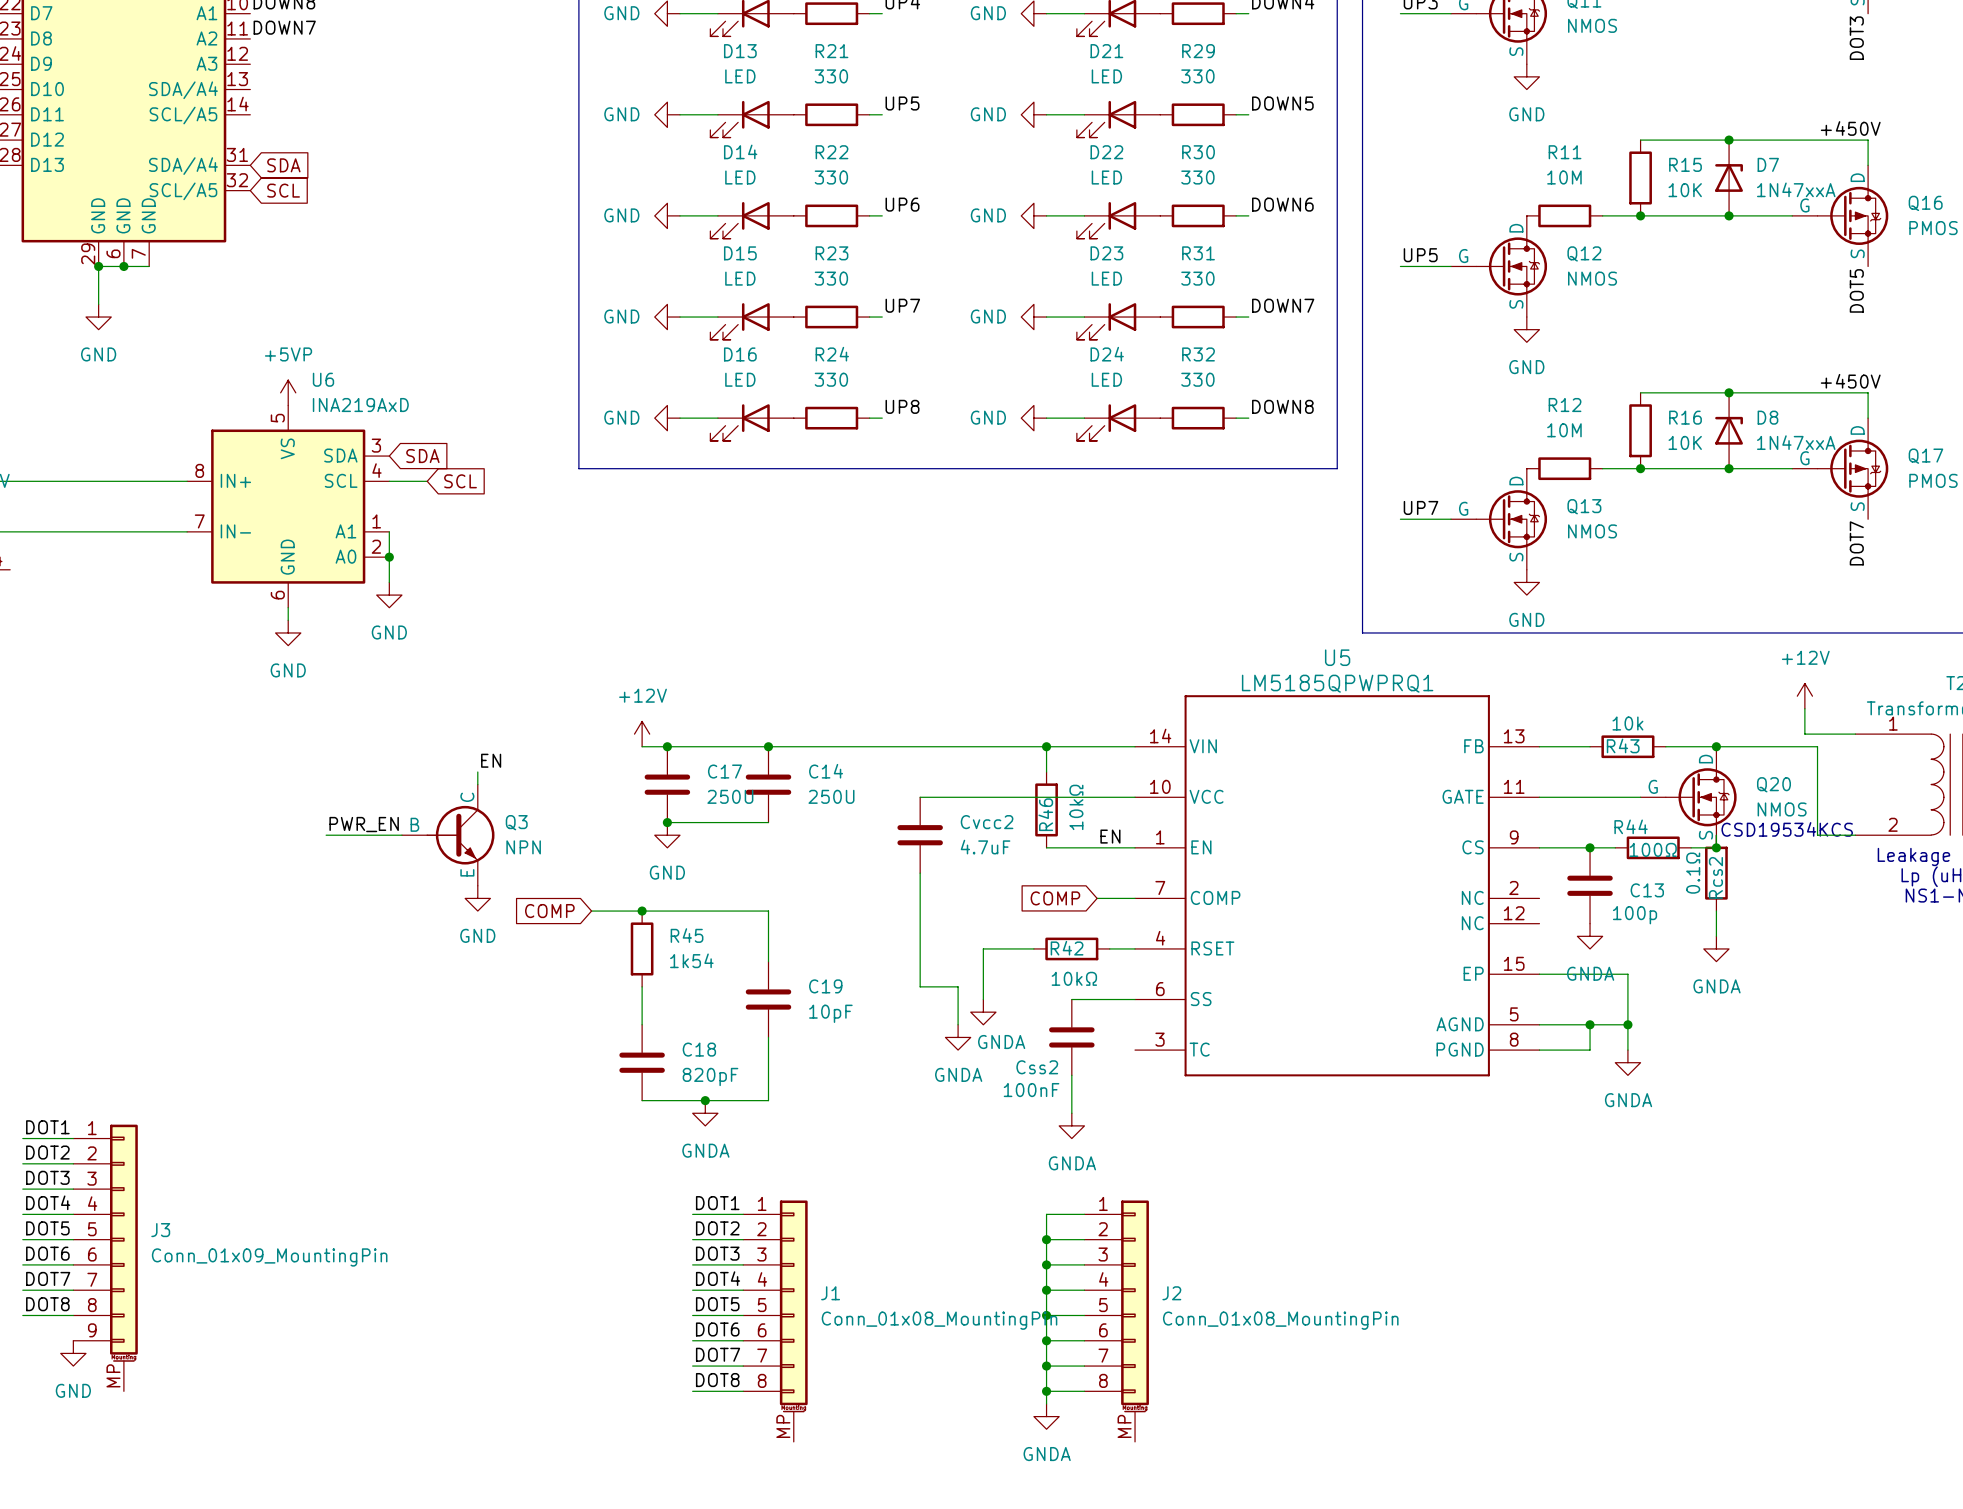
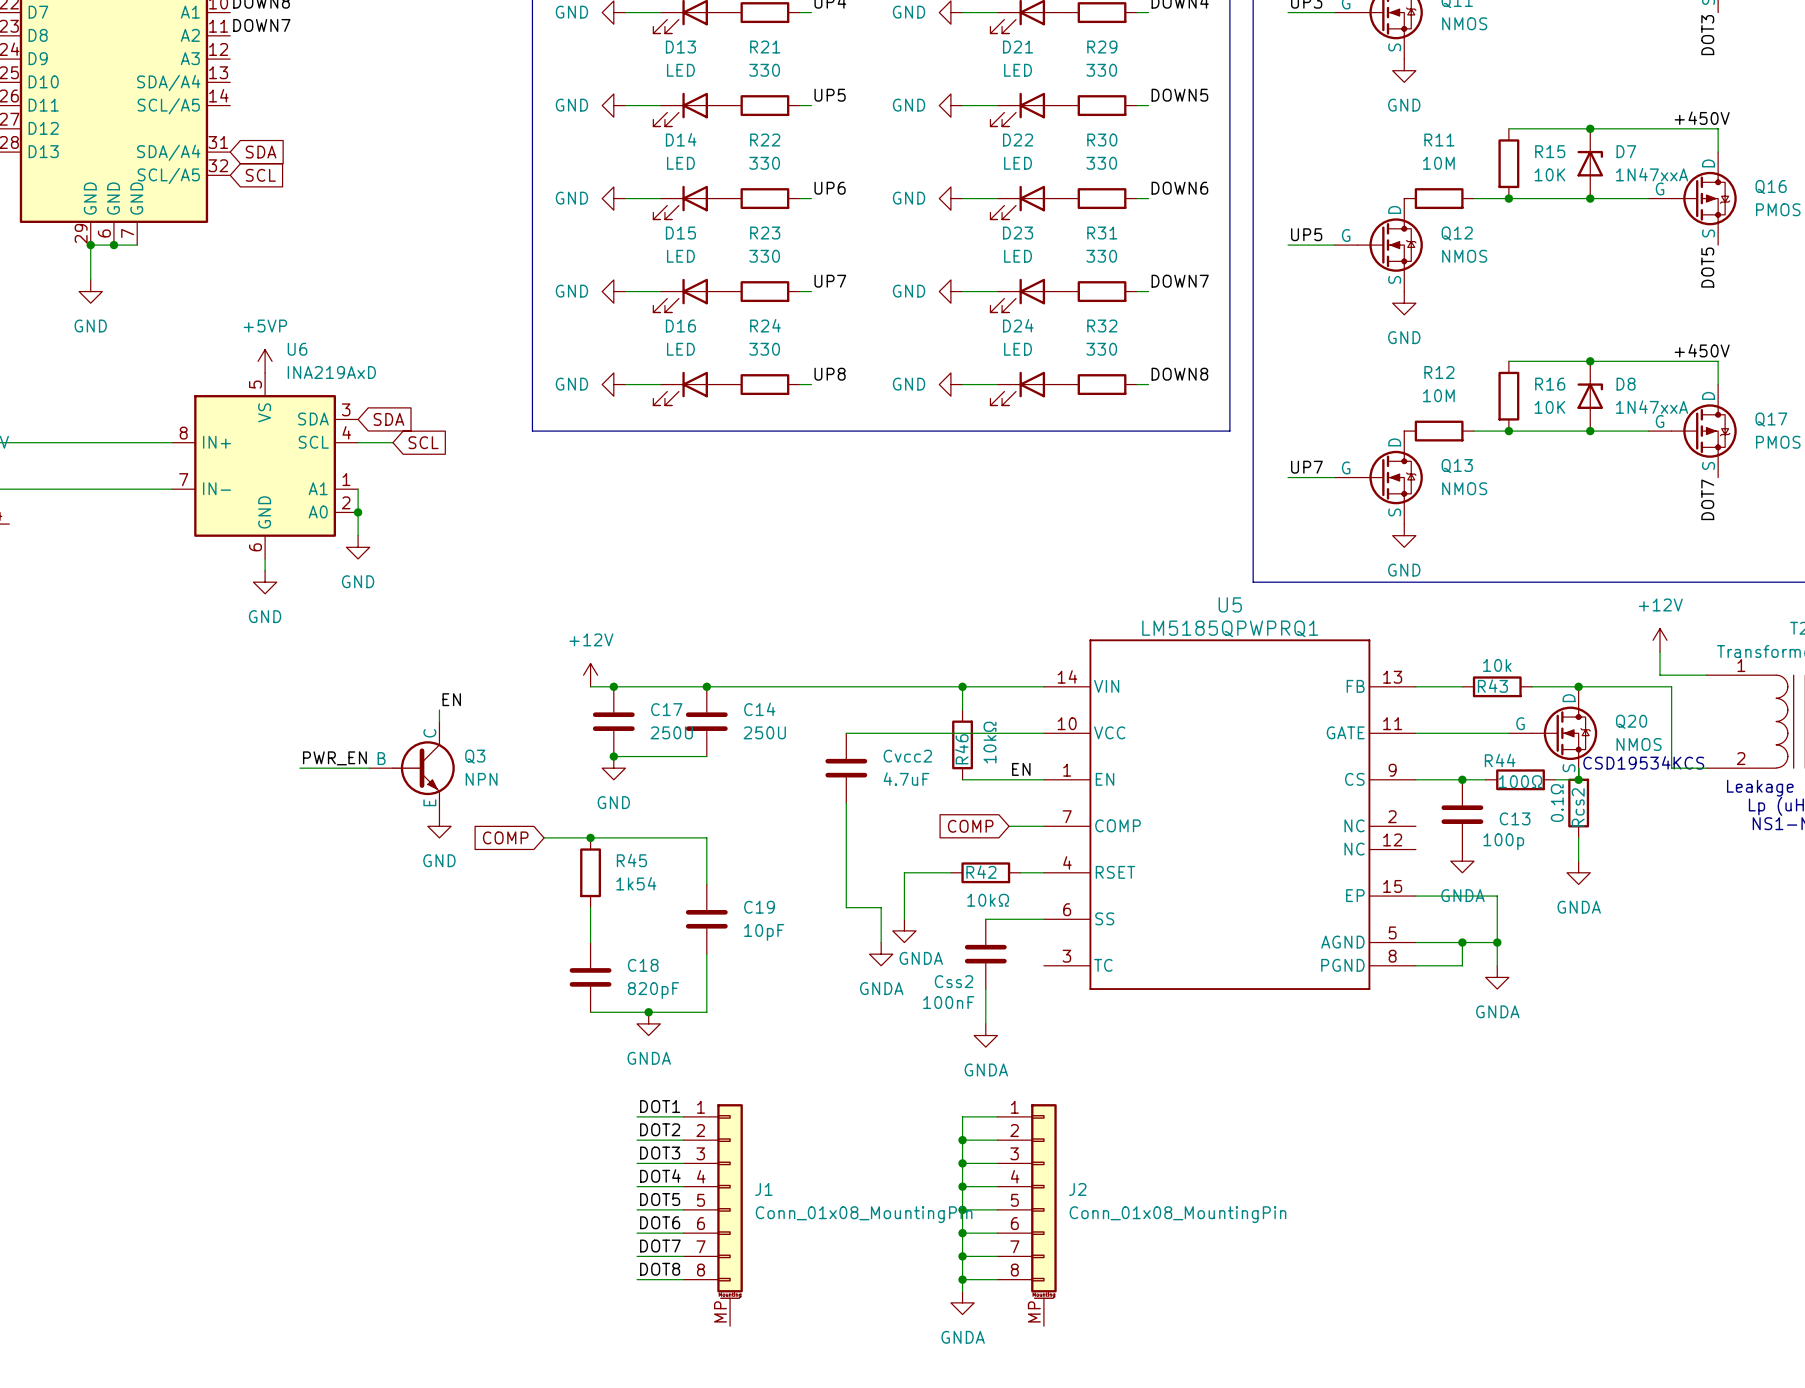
label: DOT1 (47, 1127) -> none
wire: (22, 1138) (73, 1138) -> none
label: DOT2 (47, 1152) -> none
wire: (22, 1163) (73, 1163) -> none
label: DOT3 (47, 1177) -> none
wire: (22, 1189) (73, 1189) -> none
label: DOT4 (48, 1202) -> none
wire: (22, 1214) (73, 1214) -> none
label: DOT5 (47, 1228) -> none
wire: (22, 1239) (73, 1239) -> none
label: DOT6 (47, 1253) -> none
J3: Conn_01x09_MountingPin (105, 1257) -> none
wire: (22, 1264) (73, 1264) -> none
label: DOT7 (48, 1278) -> none
wire: (22, 1290) (73, 1290) -> none
label: DOT8 (47, 1304) -> none
wire: (22, 1315) (73, 1315) -> none
power symbol: GND (73, 1353) -> none

